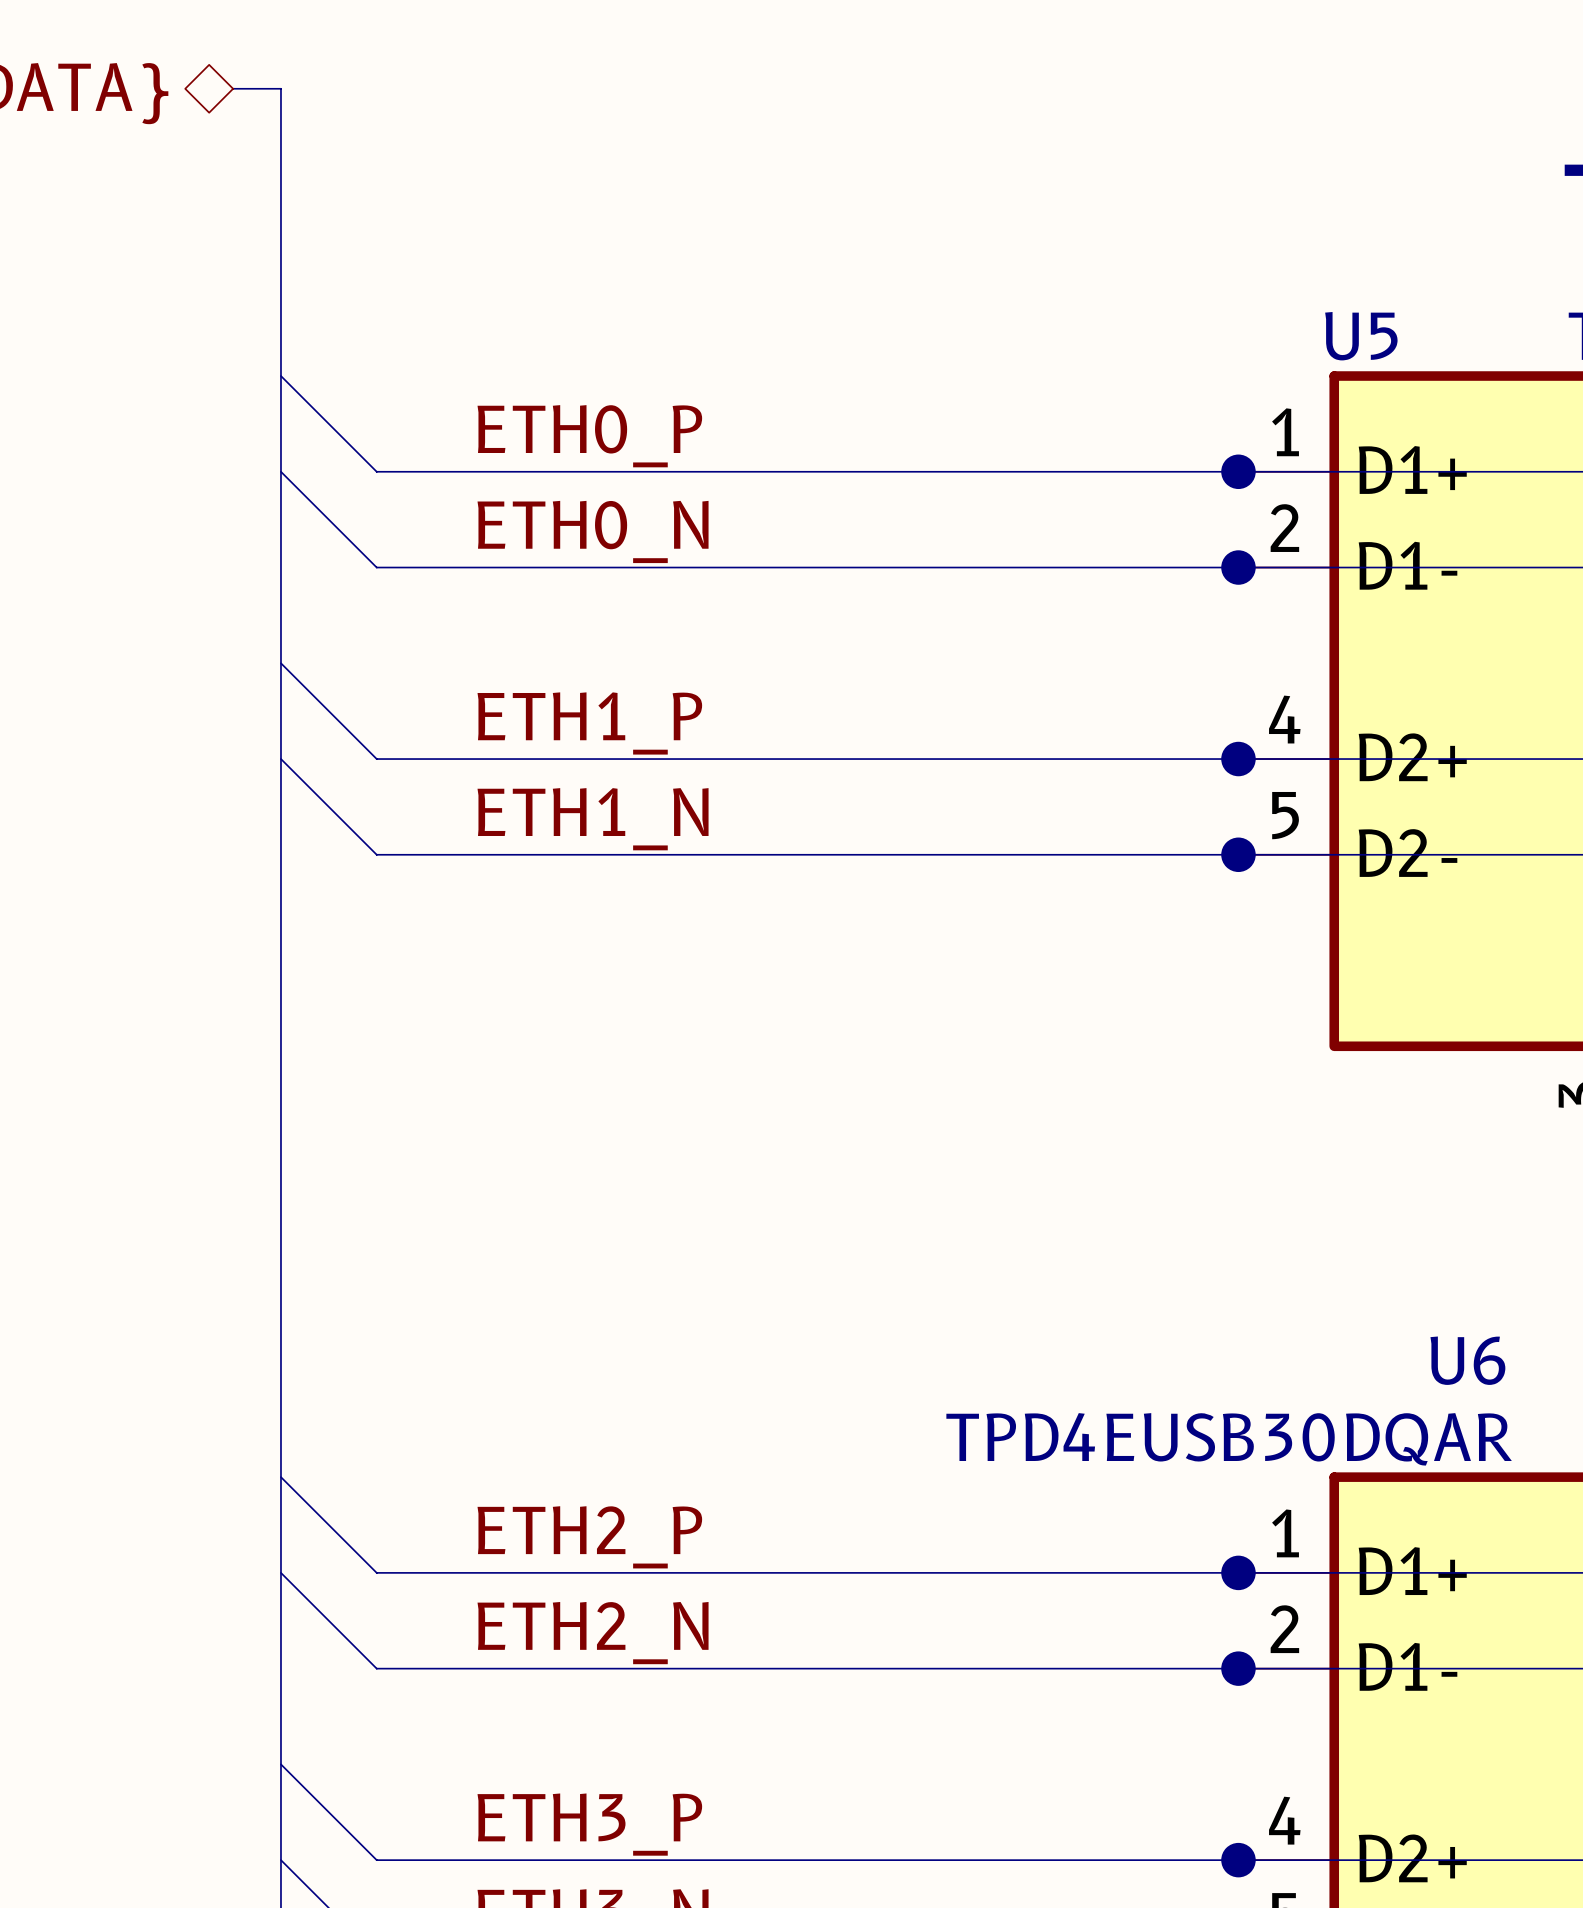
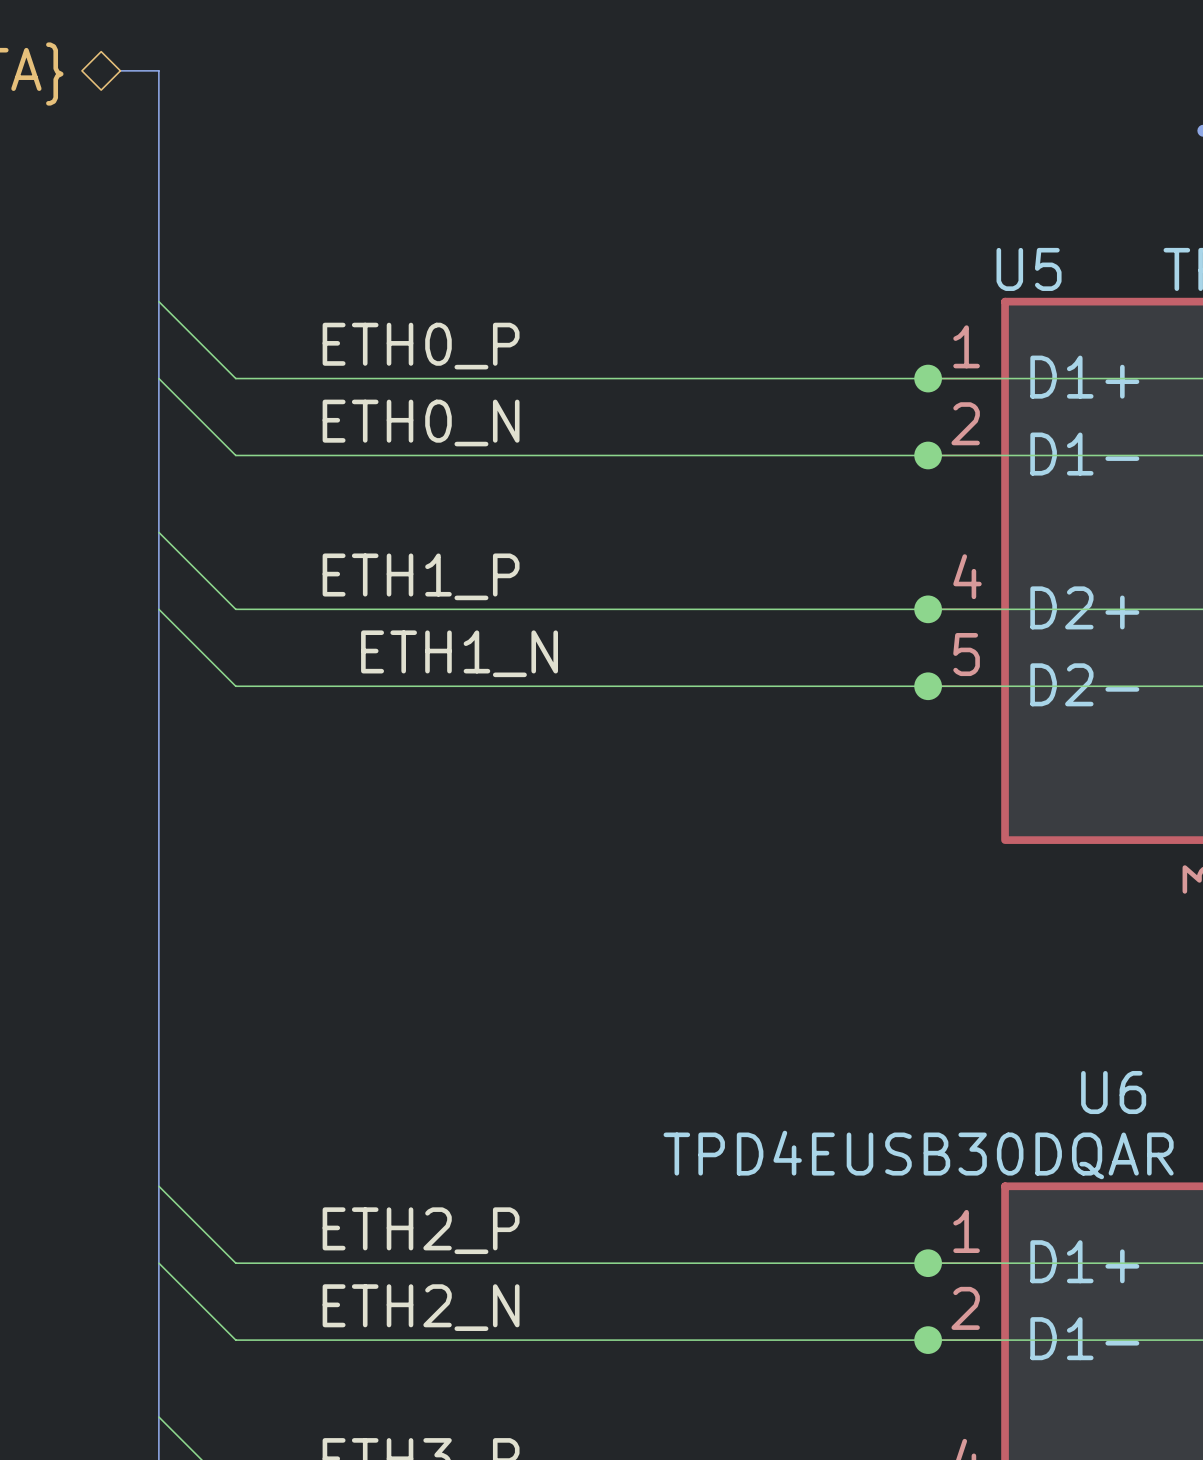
label position: ETH1_N (593, 819) -> ETH1_N (459, 653)

